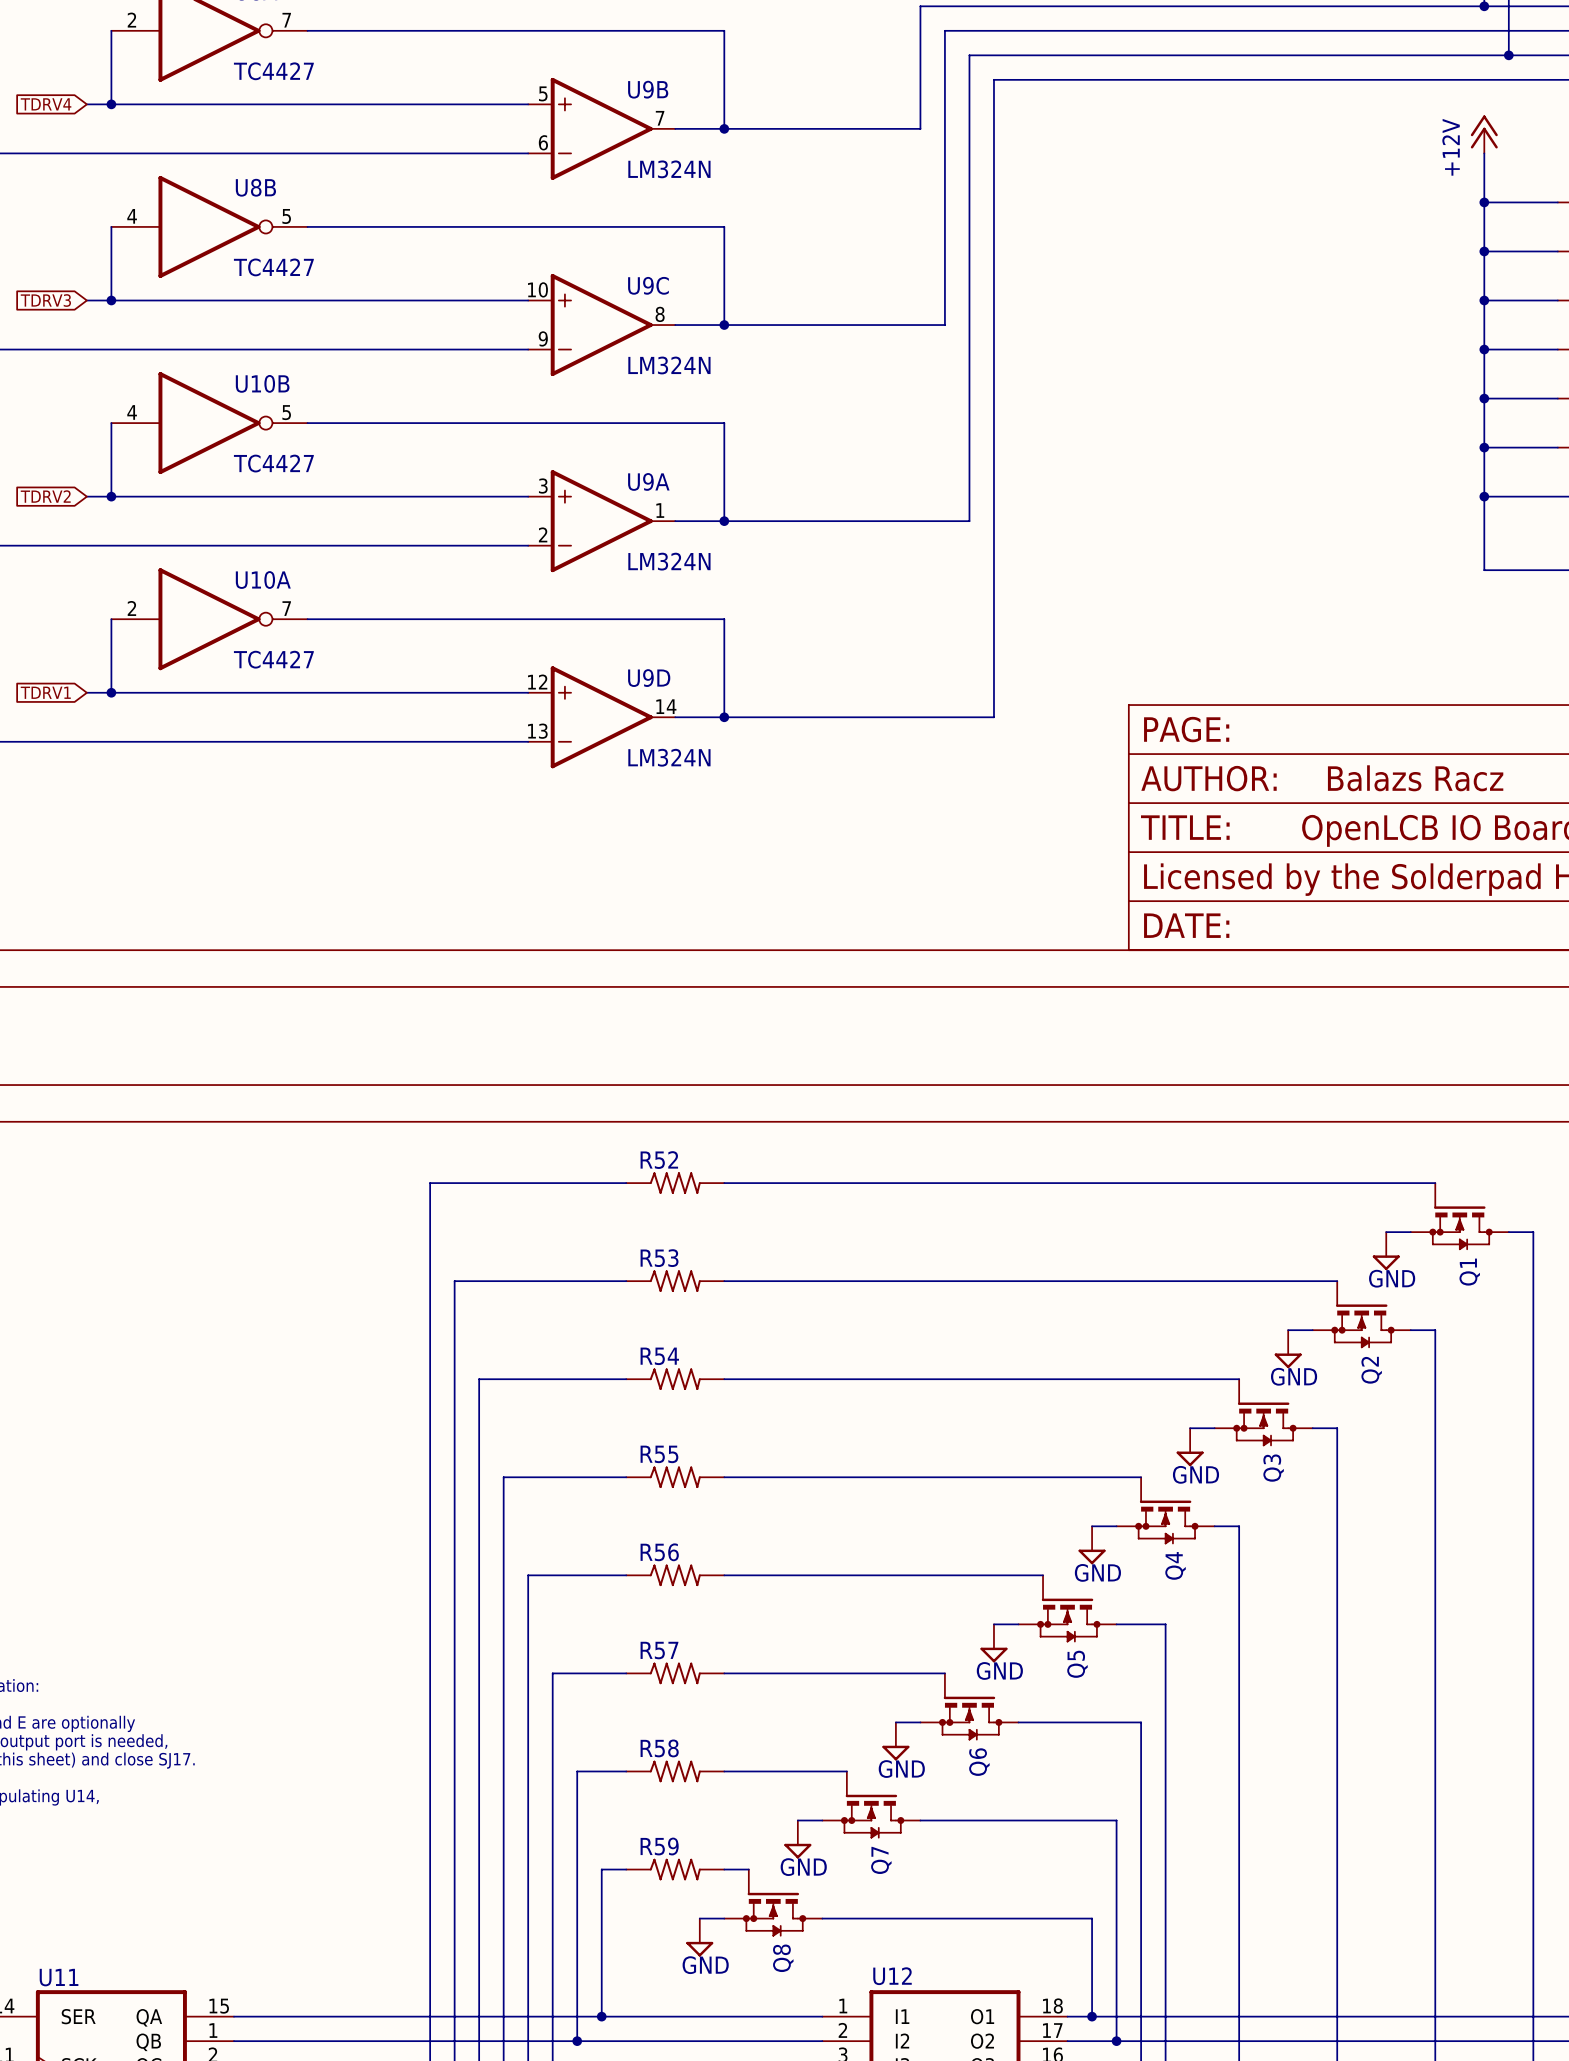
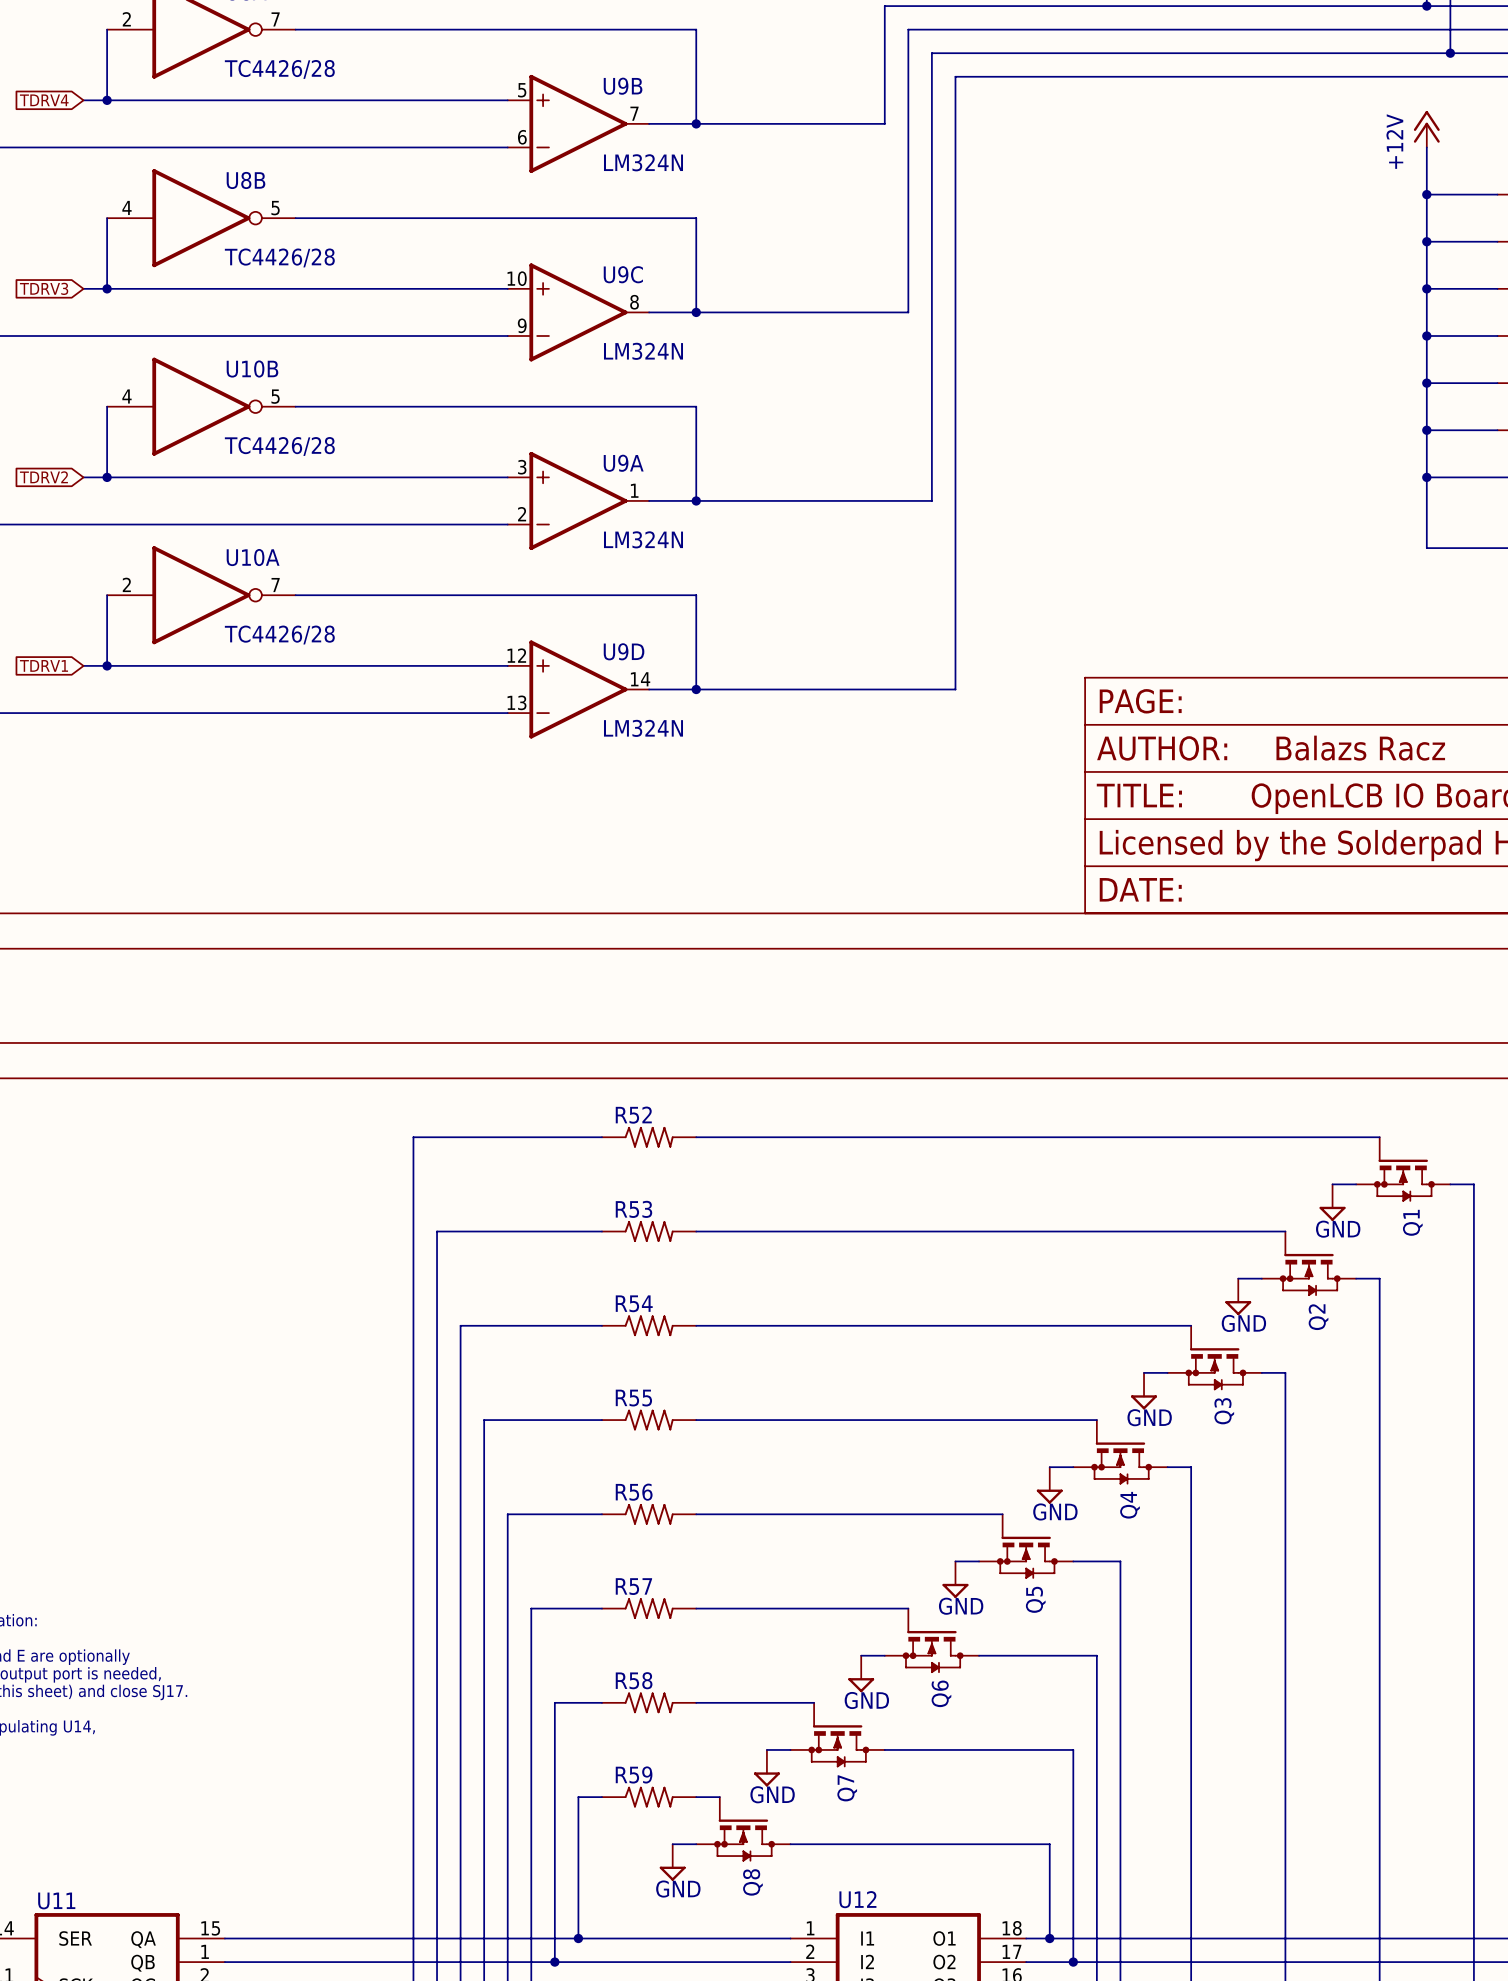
part value: TC4427 (273, 71) -> TC4426/28 (279, 69)
U8B value: TC4427 (273, 267) -> TC4426/28 (279, 257)
U10B value: TC4427 (273, 463) -> TC4426/28 (279, 446)
U10A value: TC4427 (273, 659) -> TC4426/28 (279, 635)

